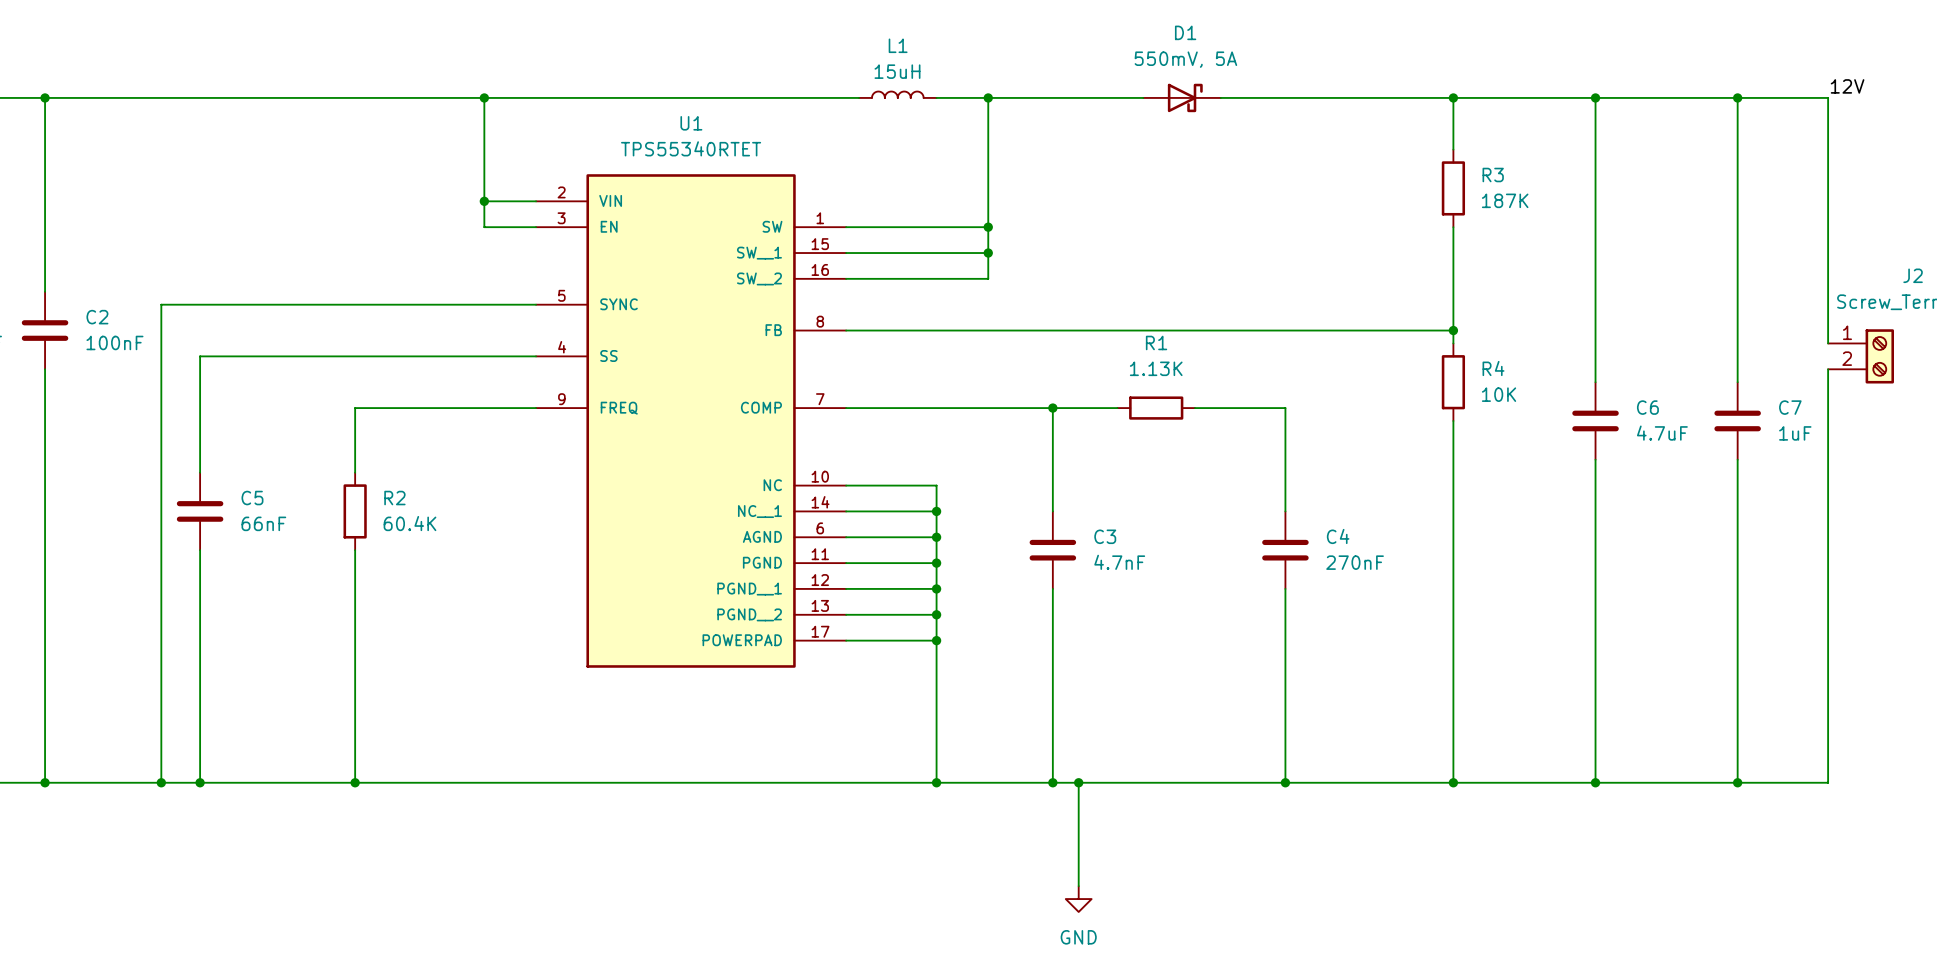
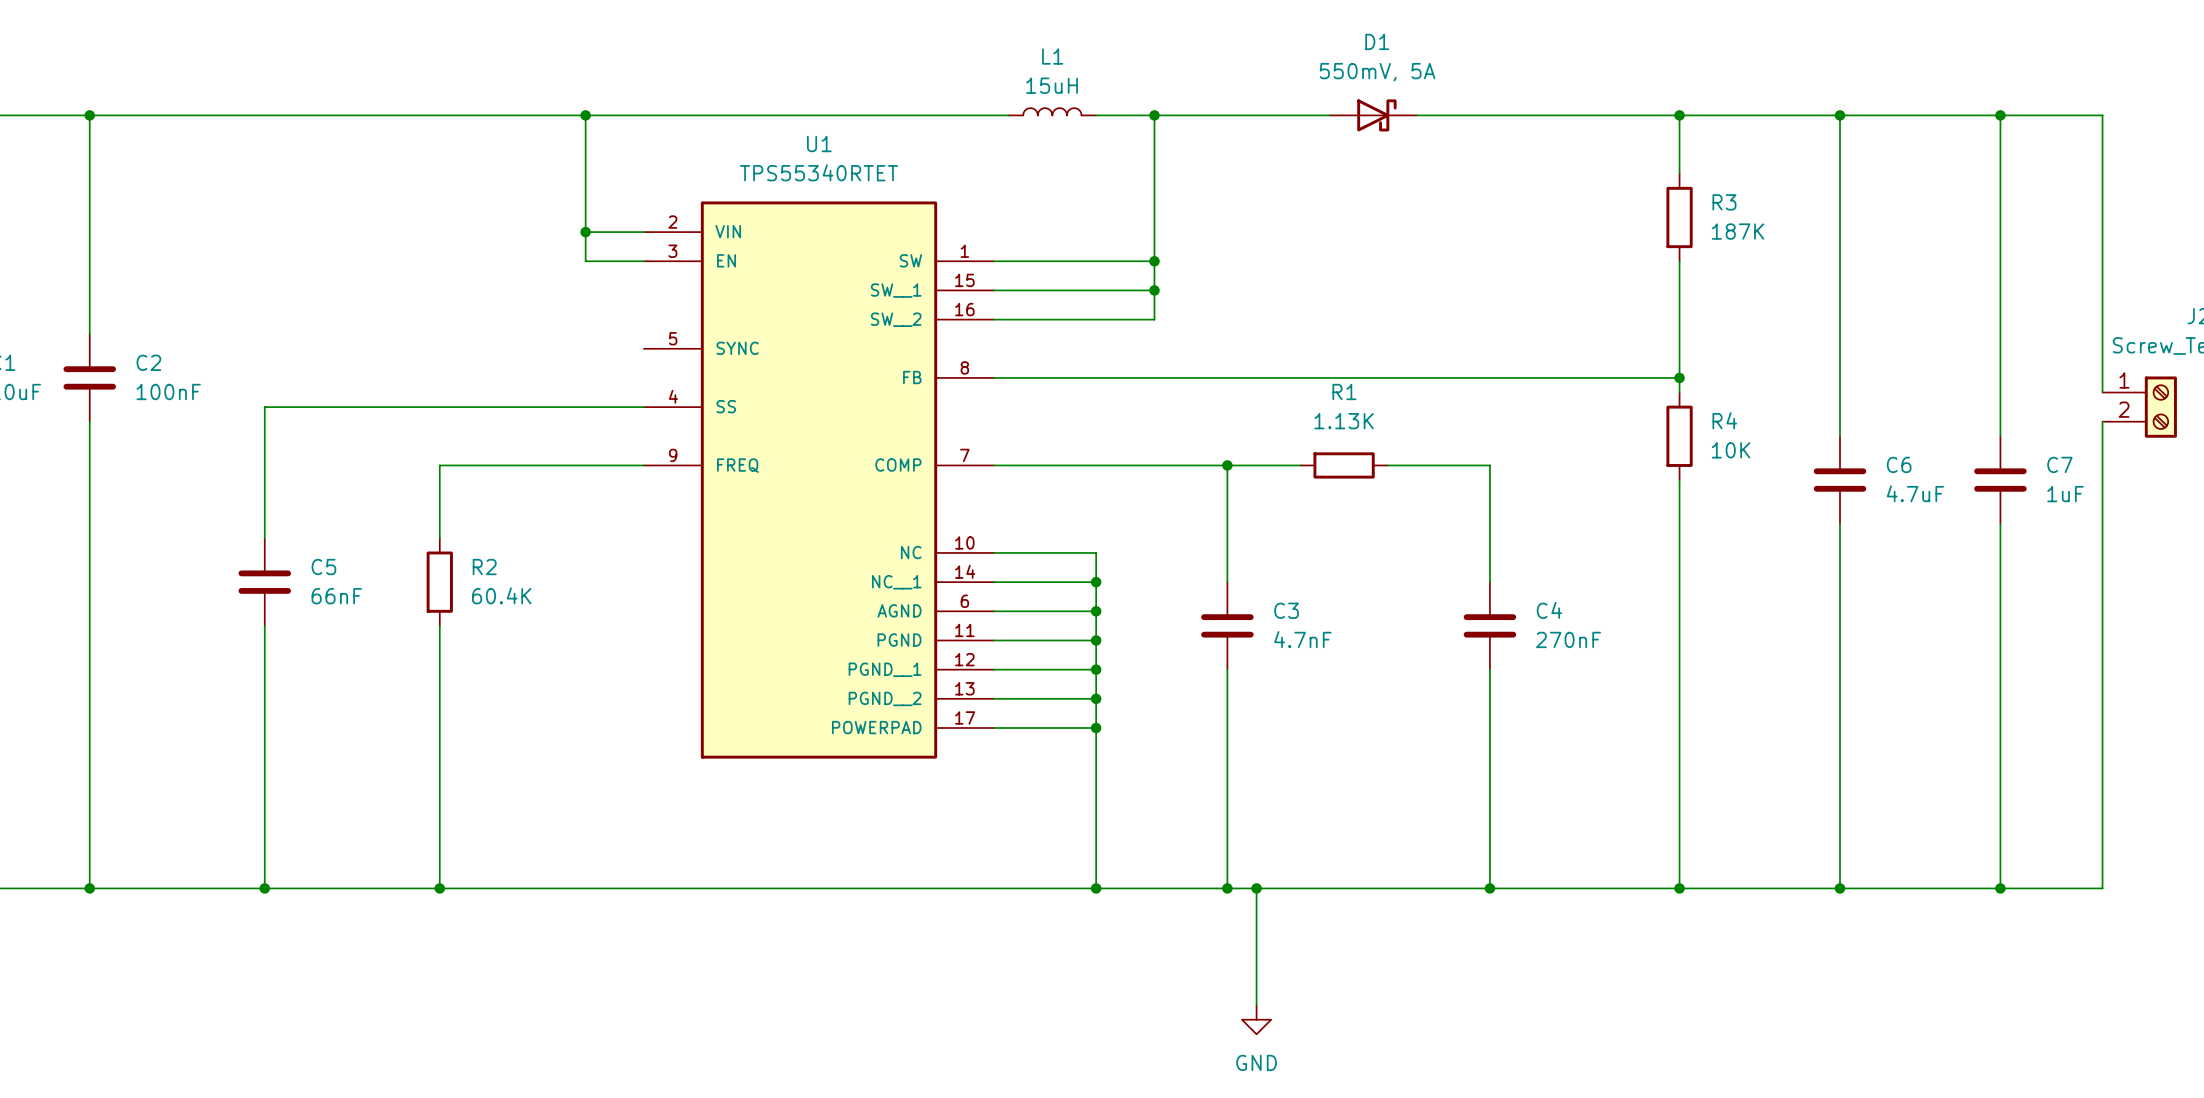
label: 12V (1847, 86) -> none
wire: (536, 304) (161, 304) (161, 782) -> none
junction: (161, 782) -> none

